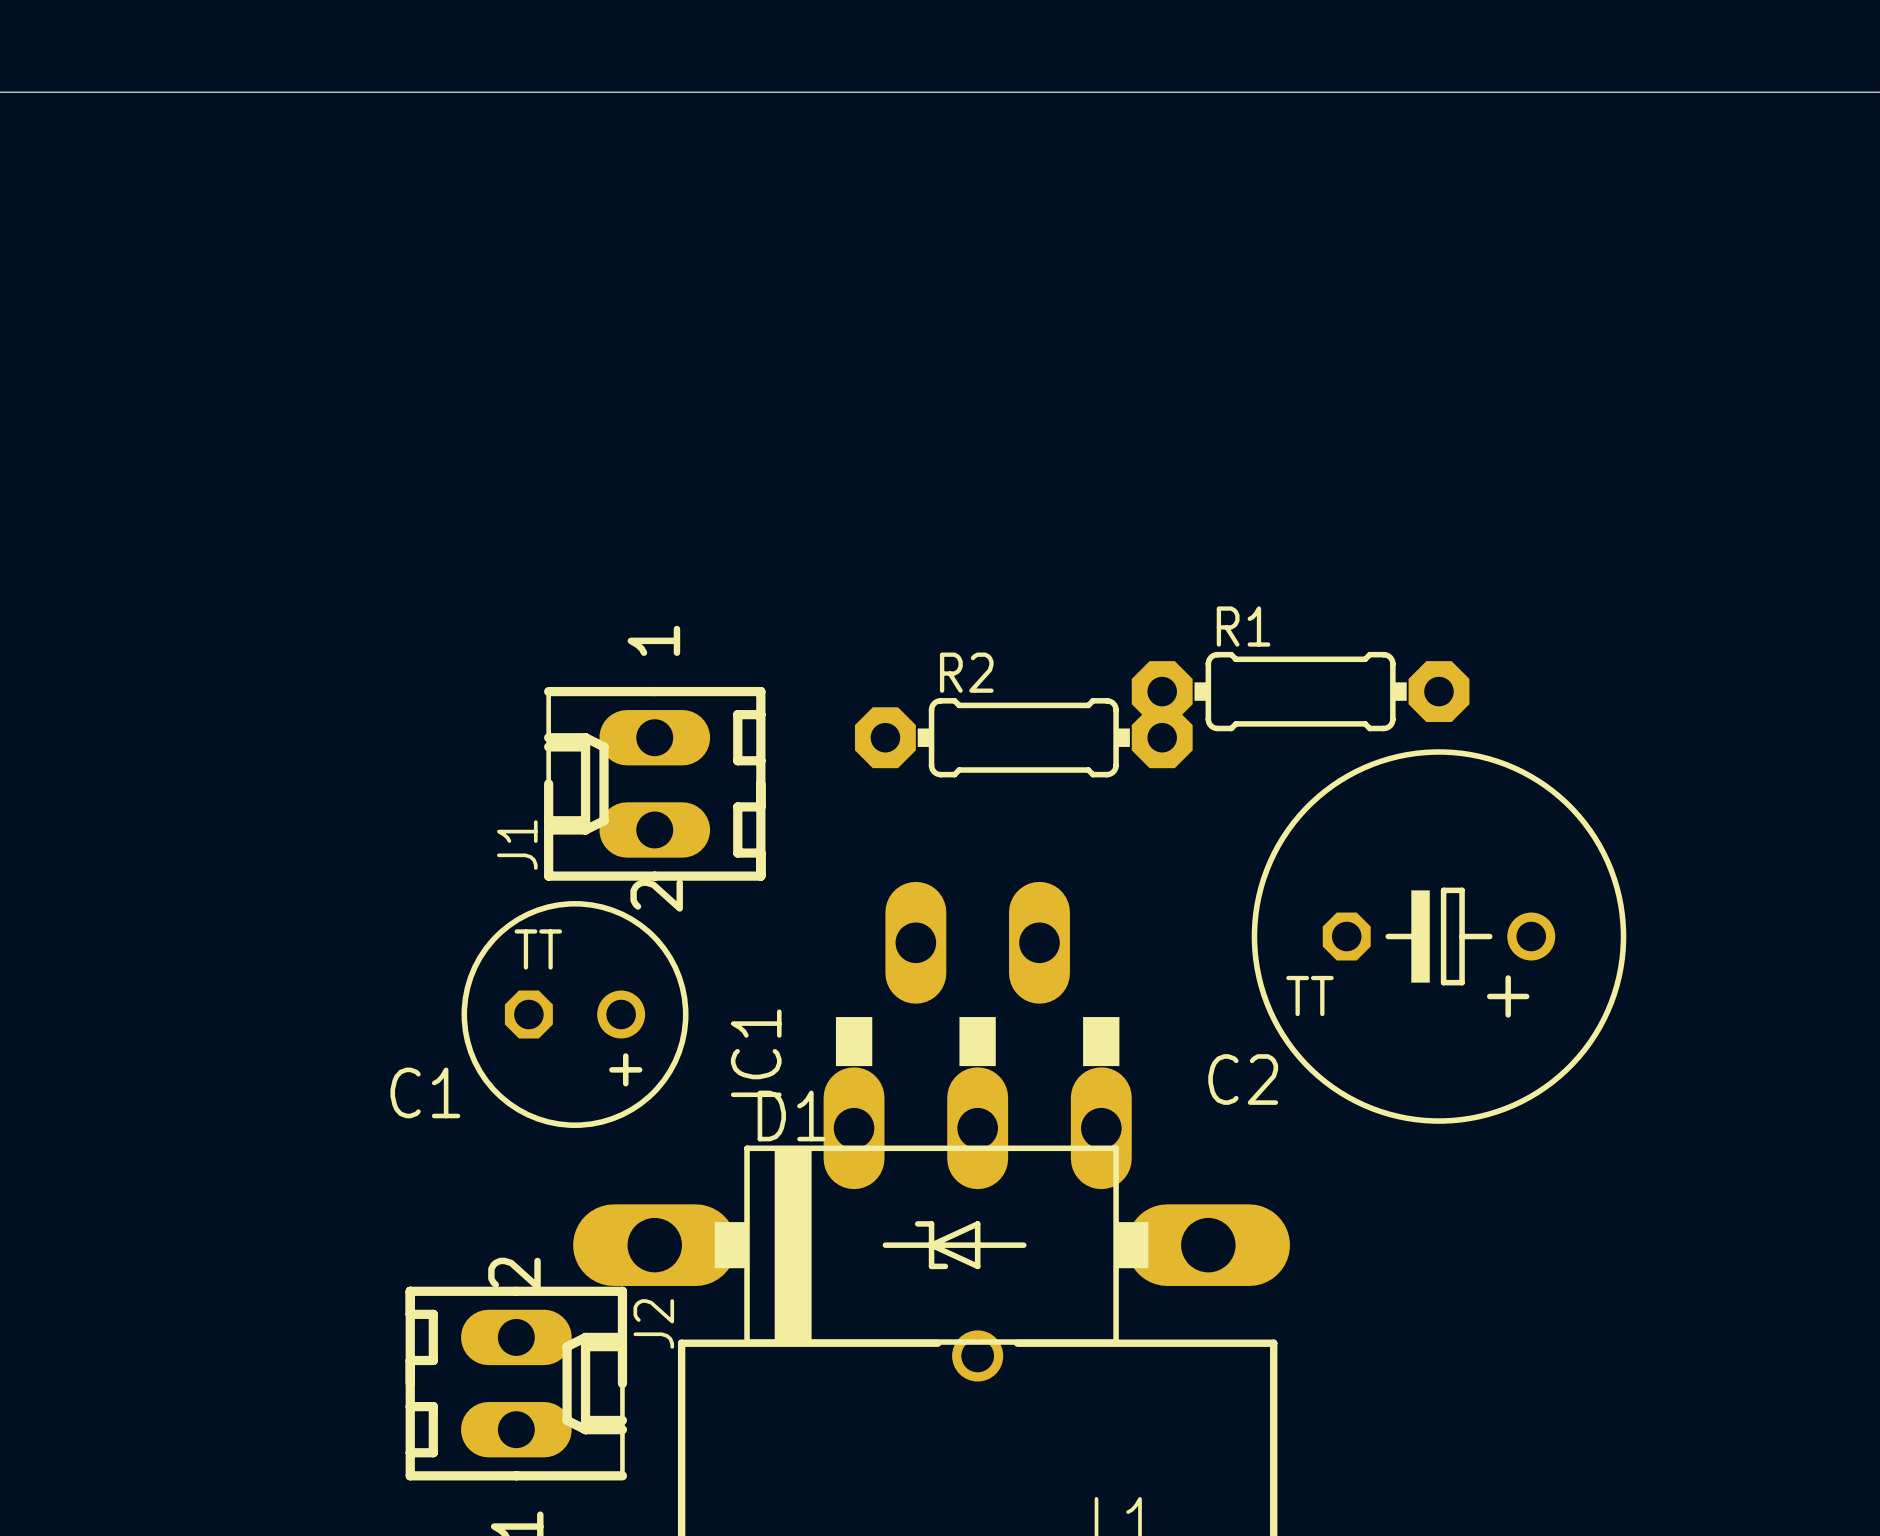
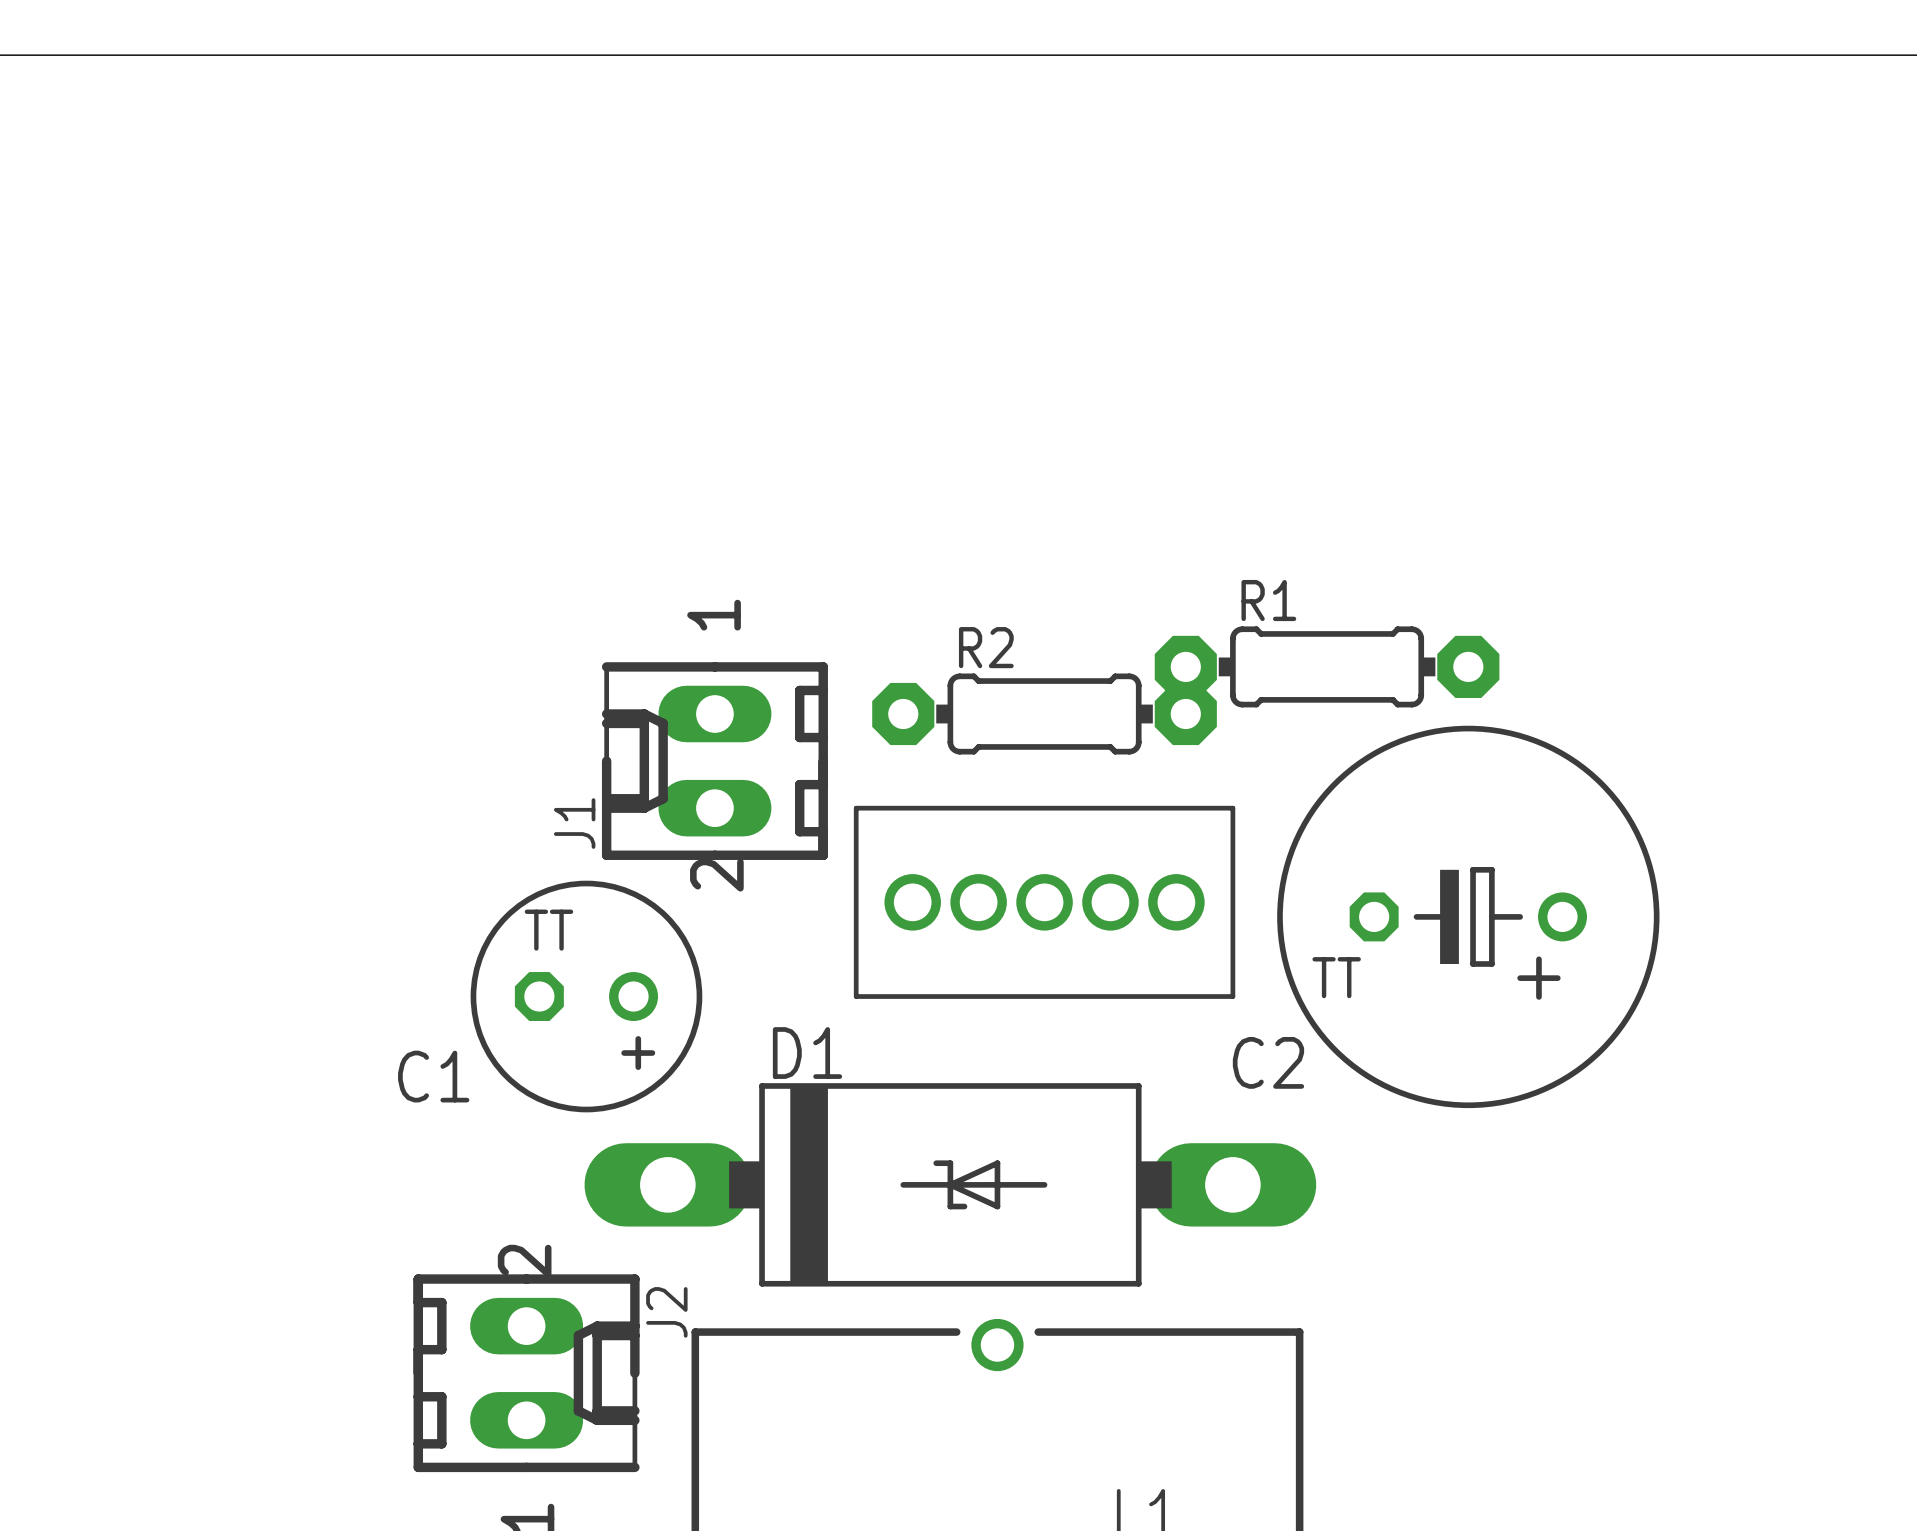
J1 position: (654, 783) -> (714, 761)
part: none -> (1044, 902)
IC1: (977, 1035) -> none
D1 position: (931, 1245) -> (950, 1184)

